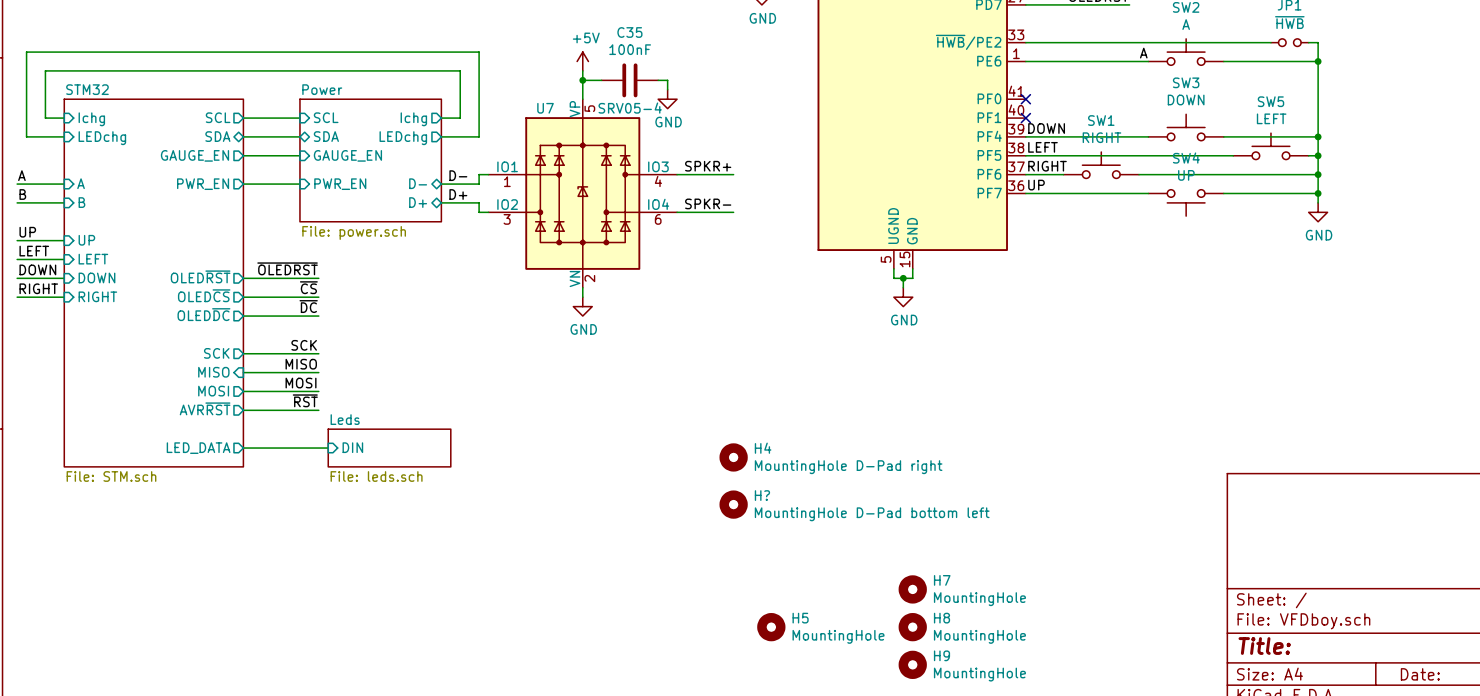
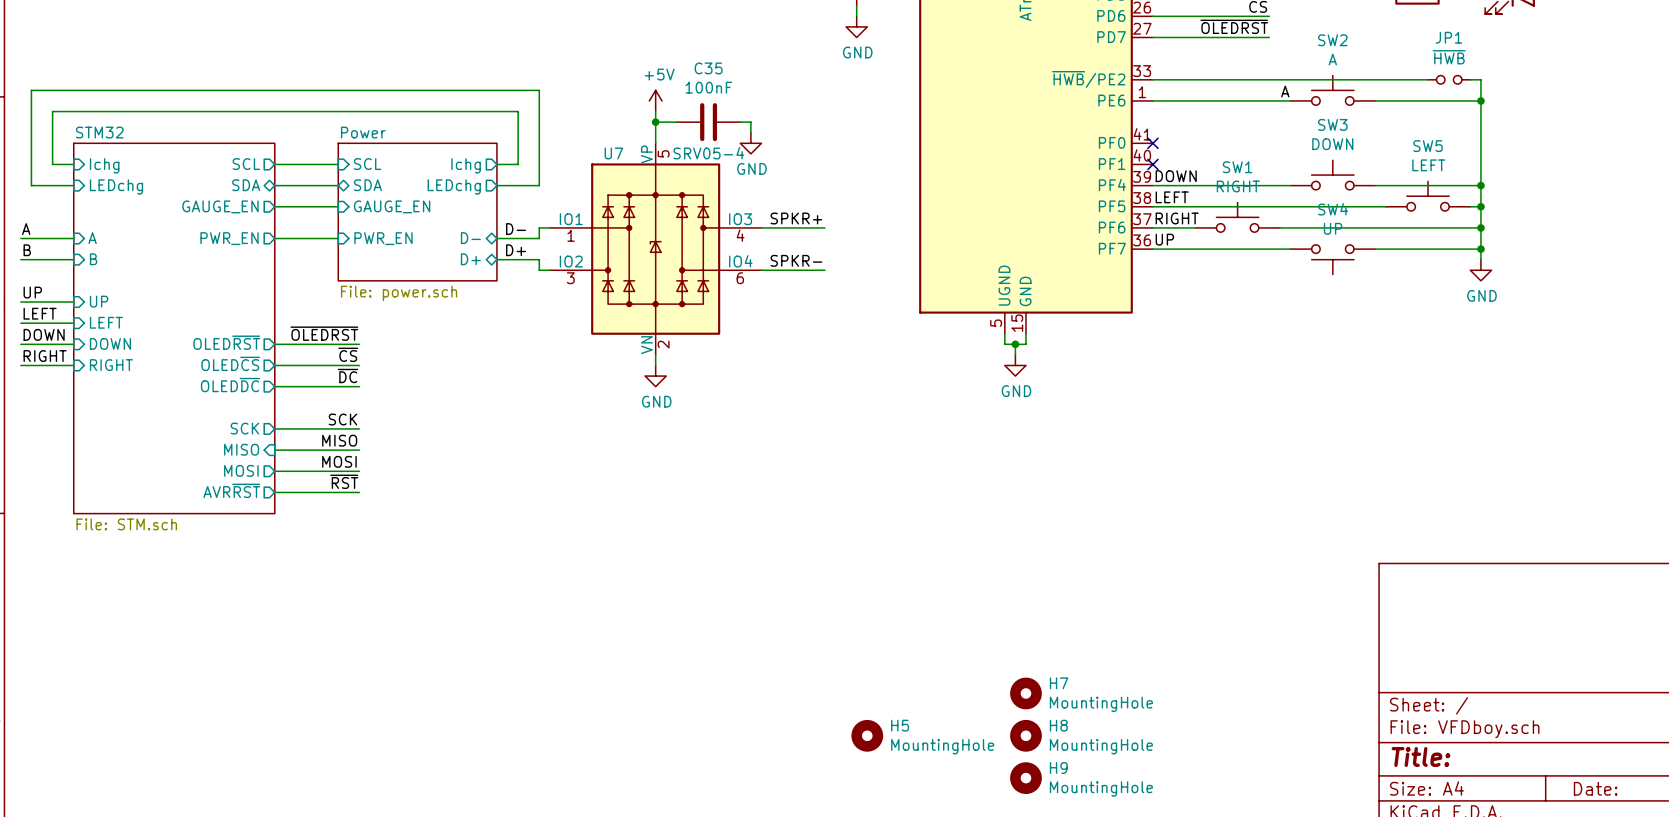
sheet STM32 shape: [64, 99, 244, 467] -> [73, 143, 275, 514]
sheet pin: DIN (352, 447) -> none
sheet pin: LED_DATA (198, 448) -> none
wire: (243, 448) (328, 448) -> none
sheet Leds: File: leds.sch (389, 448) -> none
H4: MountingHole D-Pad right (733, 457) -> none
sheet STM32 value position: File: STM.sch (111, 476) -> File: STM.sch (126, 524)
H?: MountingHole D-Pad bottom left (733, 504) -> none

